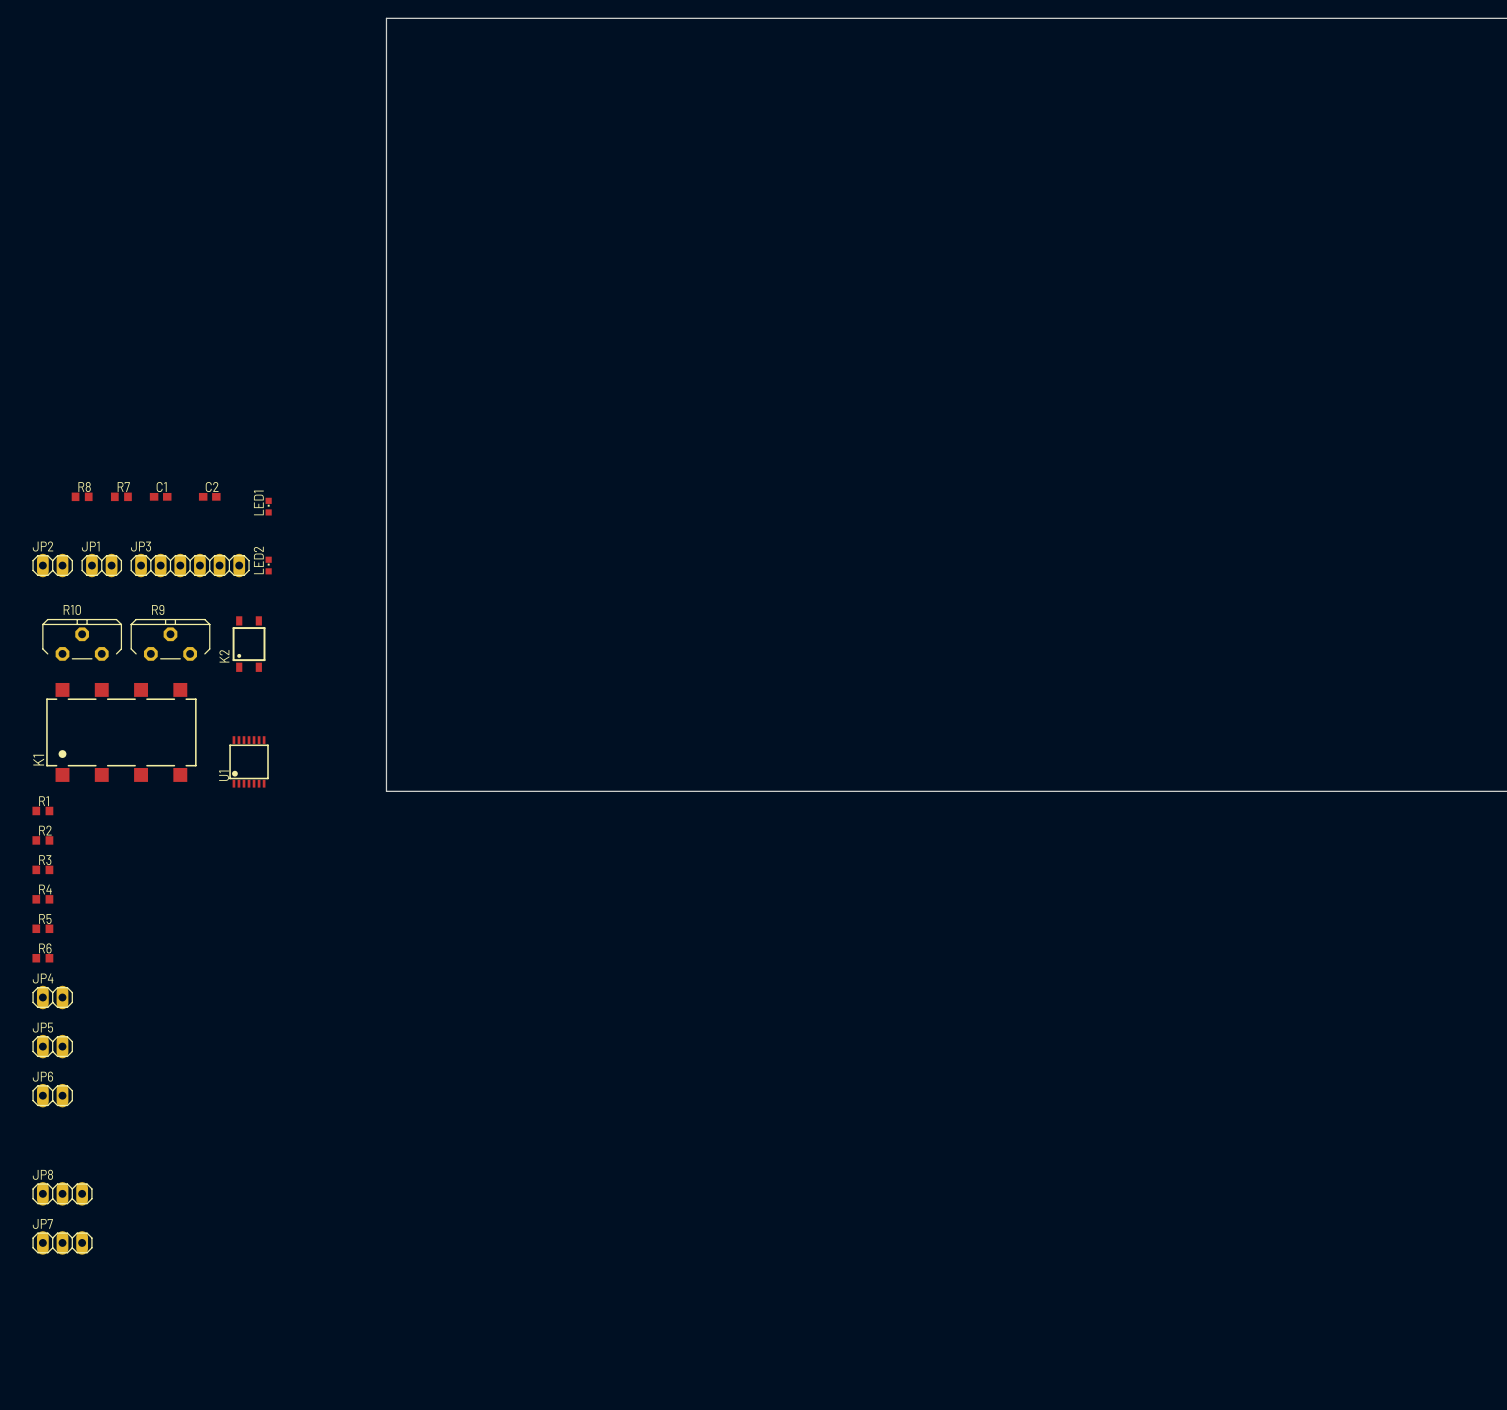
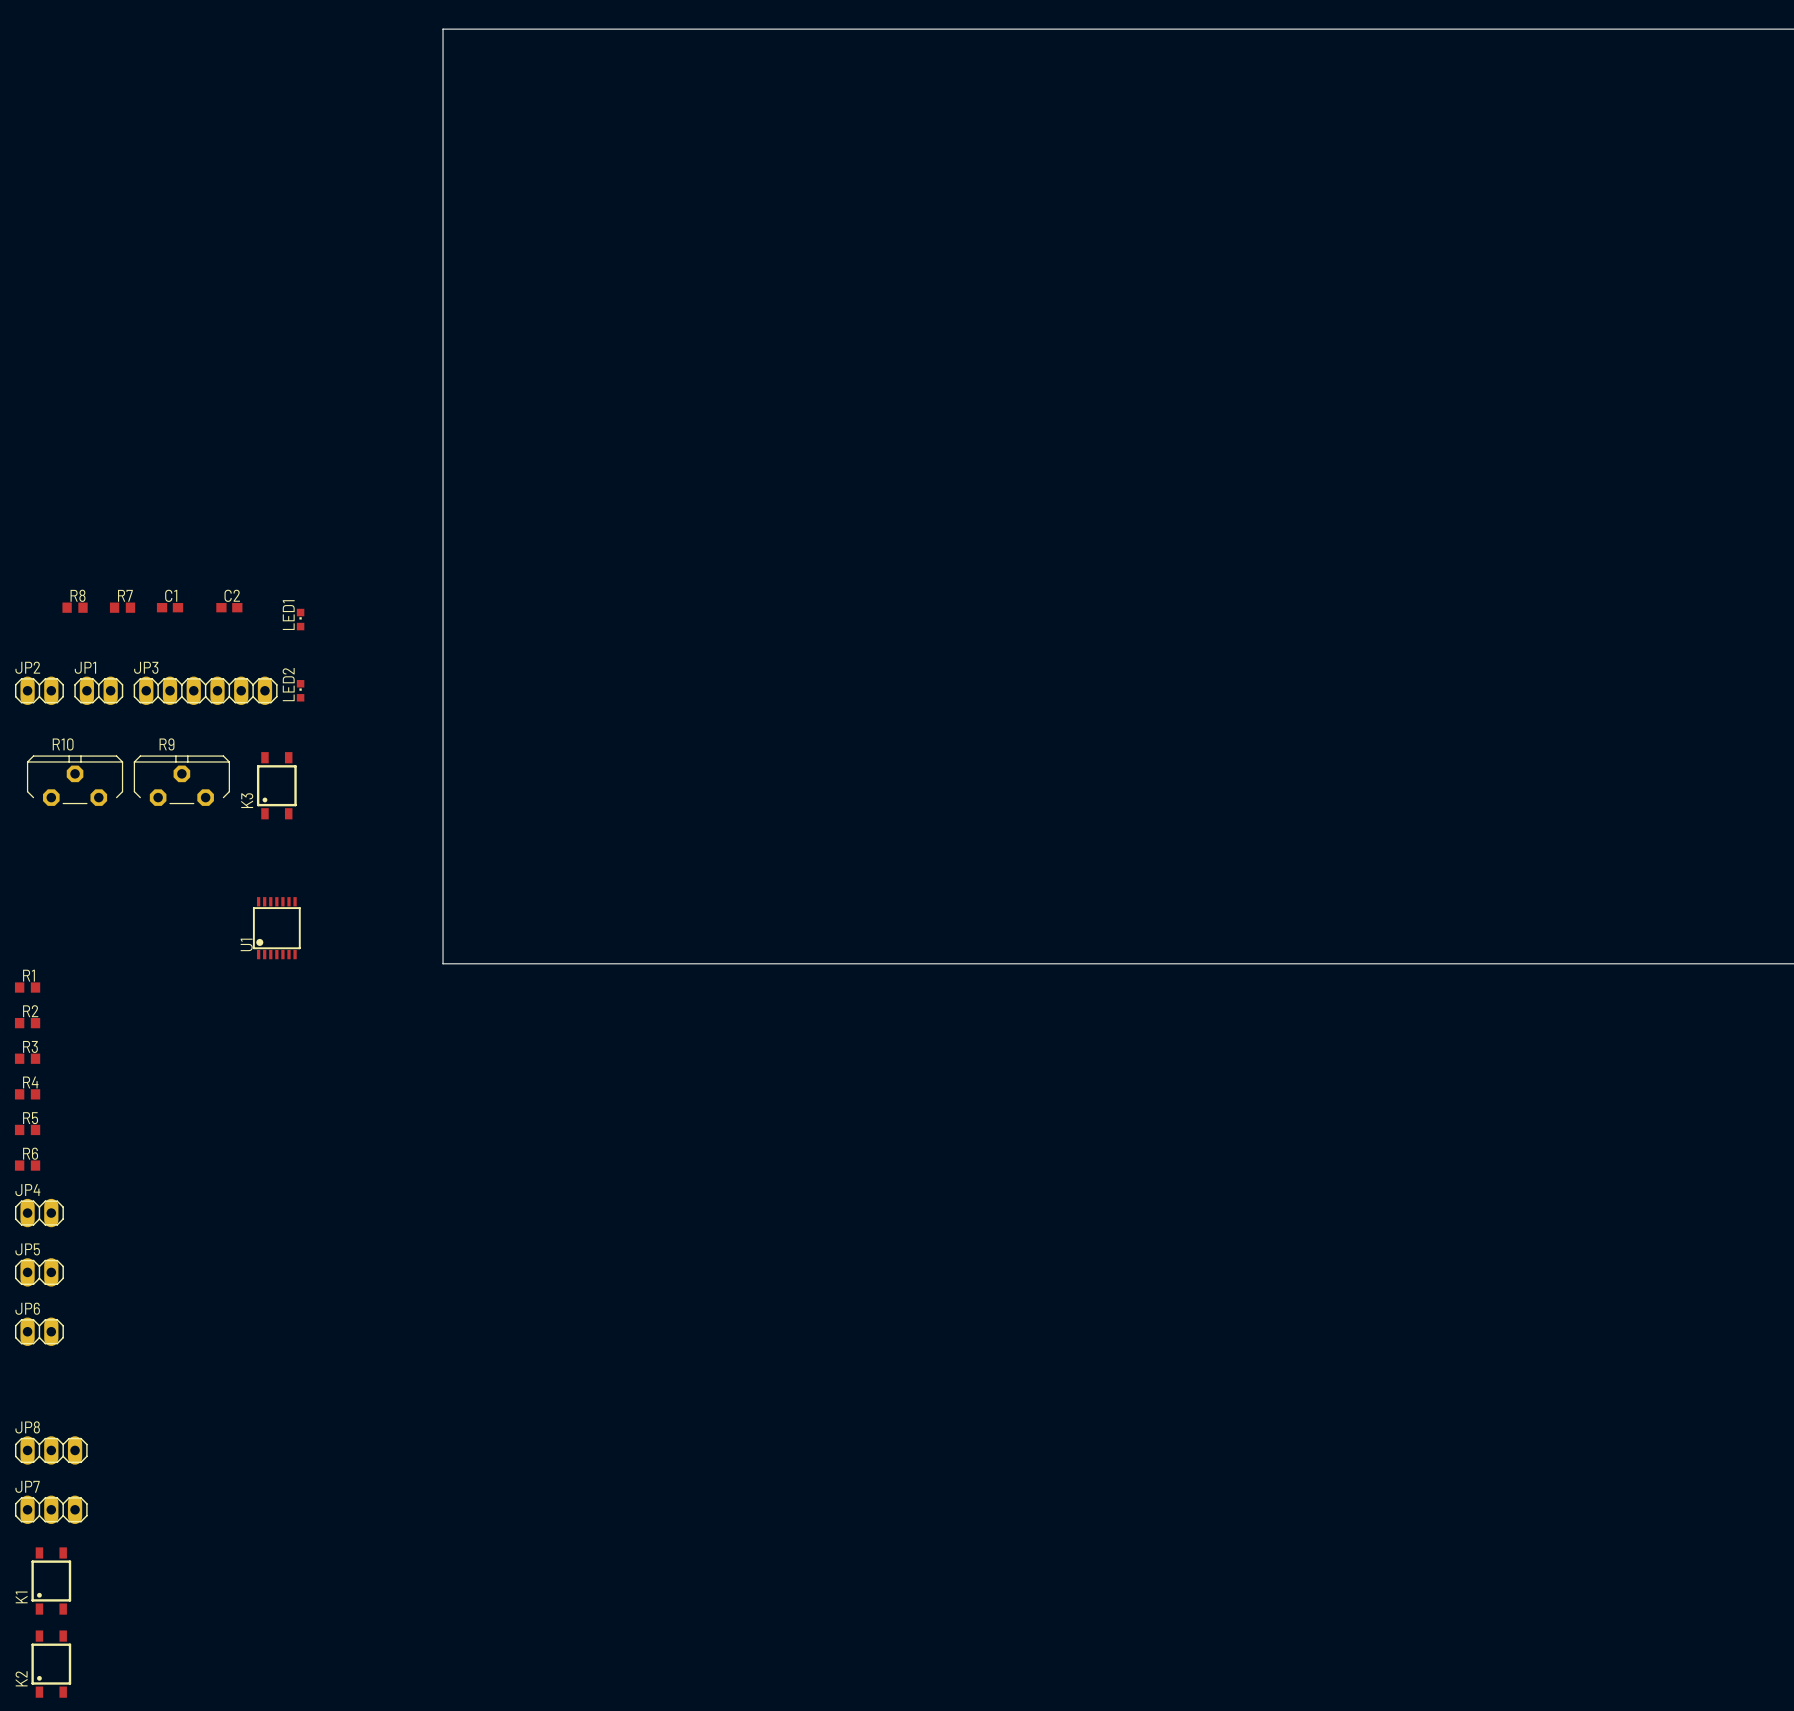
K2 name: K2 (224, 656) -> K3 (247, 800)
K1 footprint: [46, 682, 197, 782] -> [31, 1547, 72, 1615]
K1 name position: K1 (38, 760) -> K1 (21, 1597)
K2: none -> (51, 1664)

